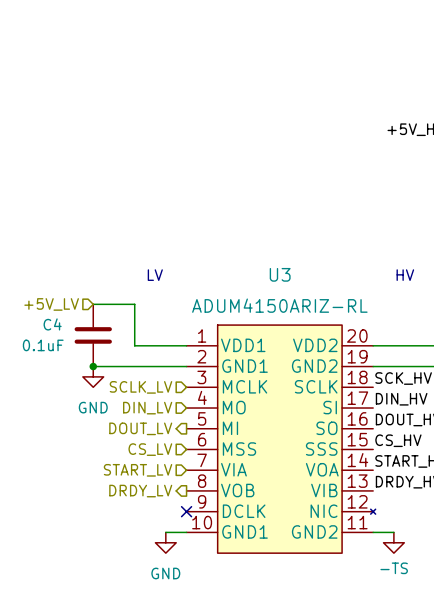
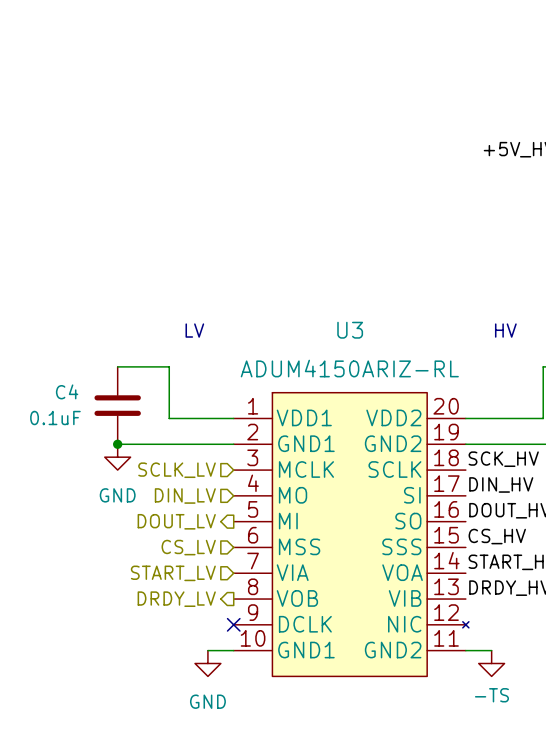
hierarchical label: +5V_LV (51, 304) -> none

